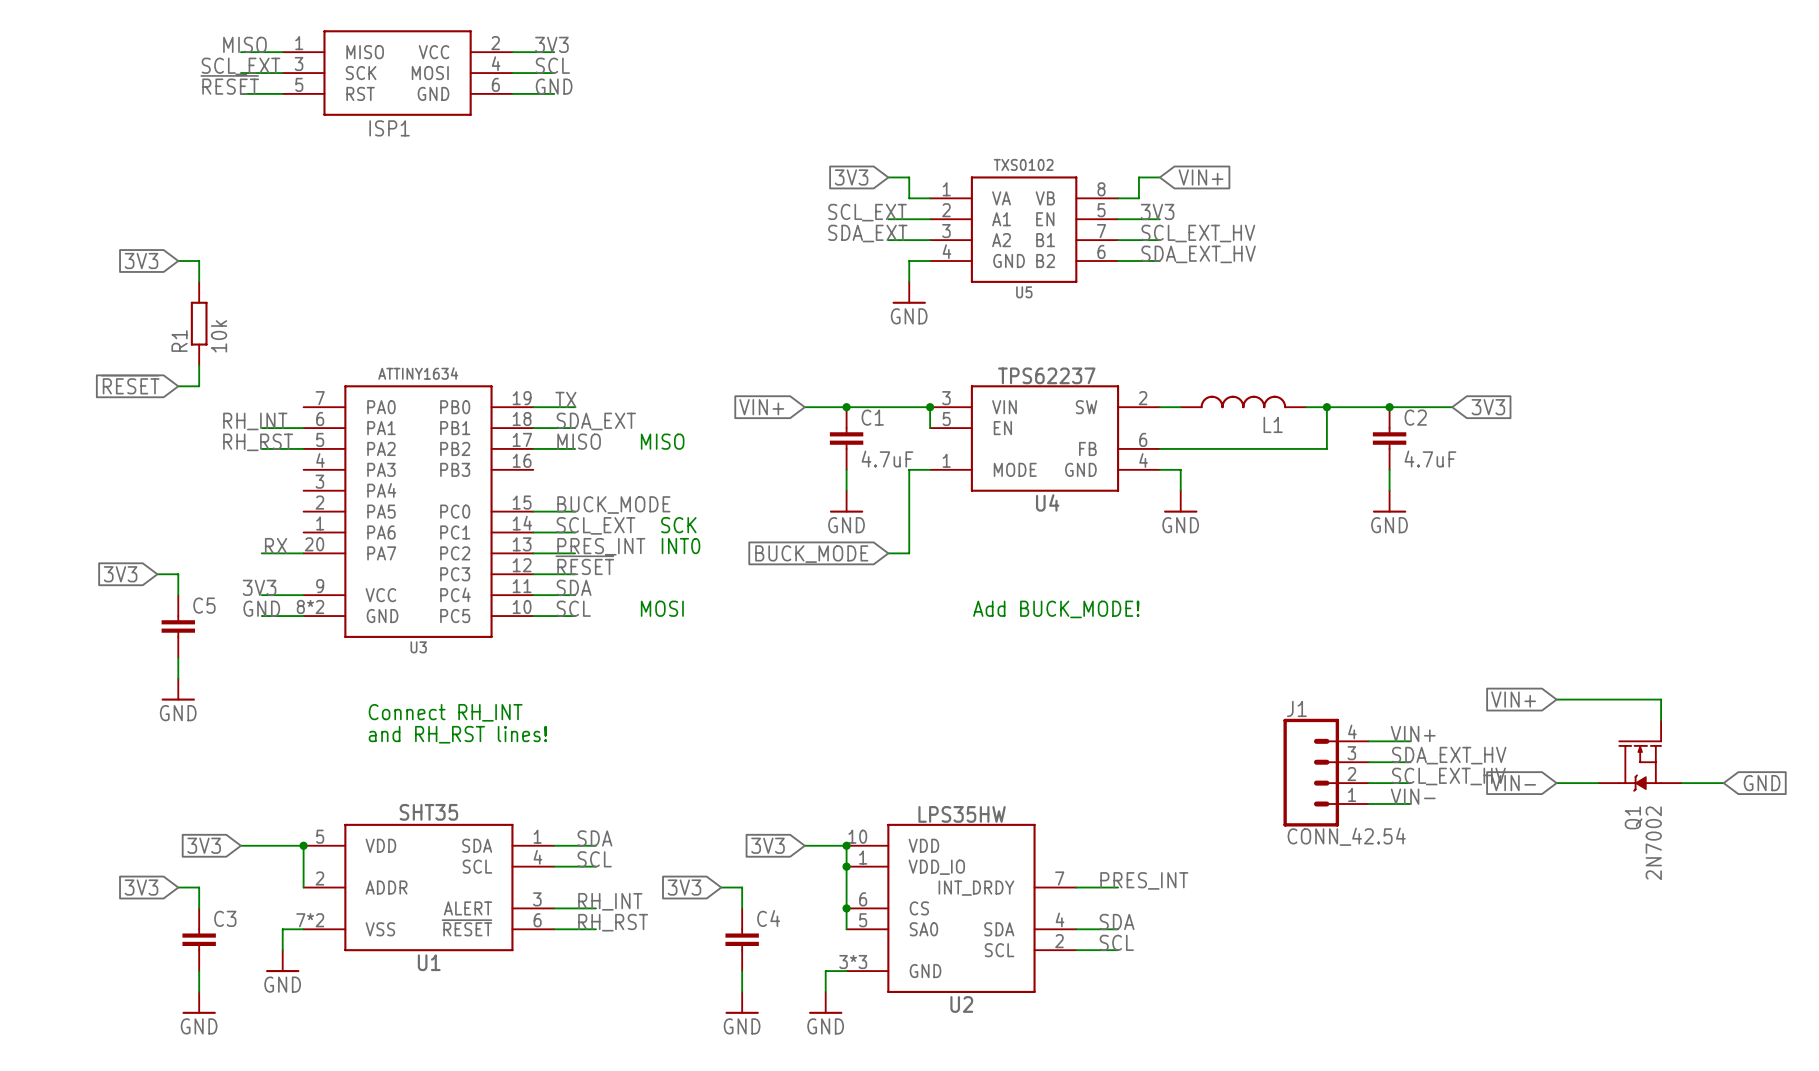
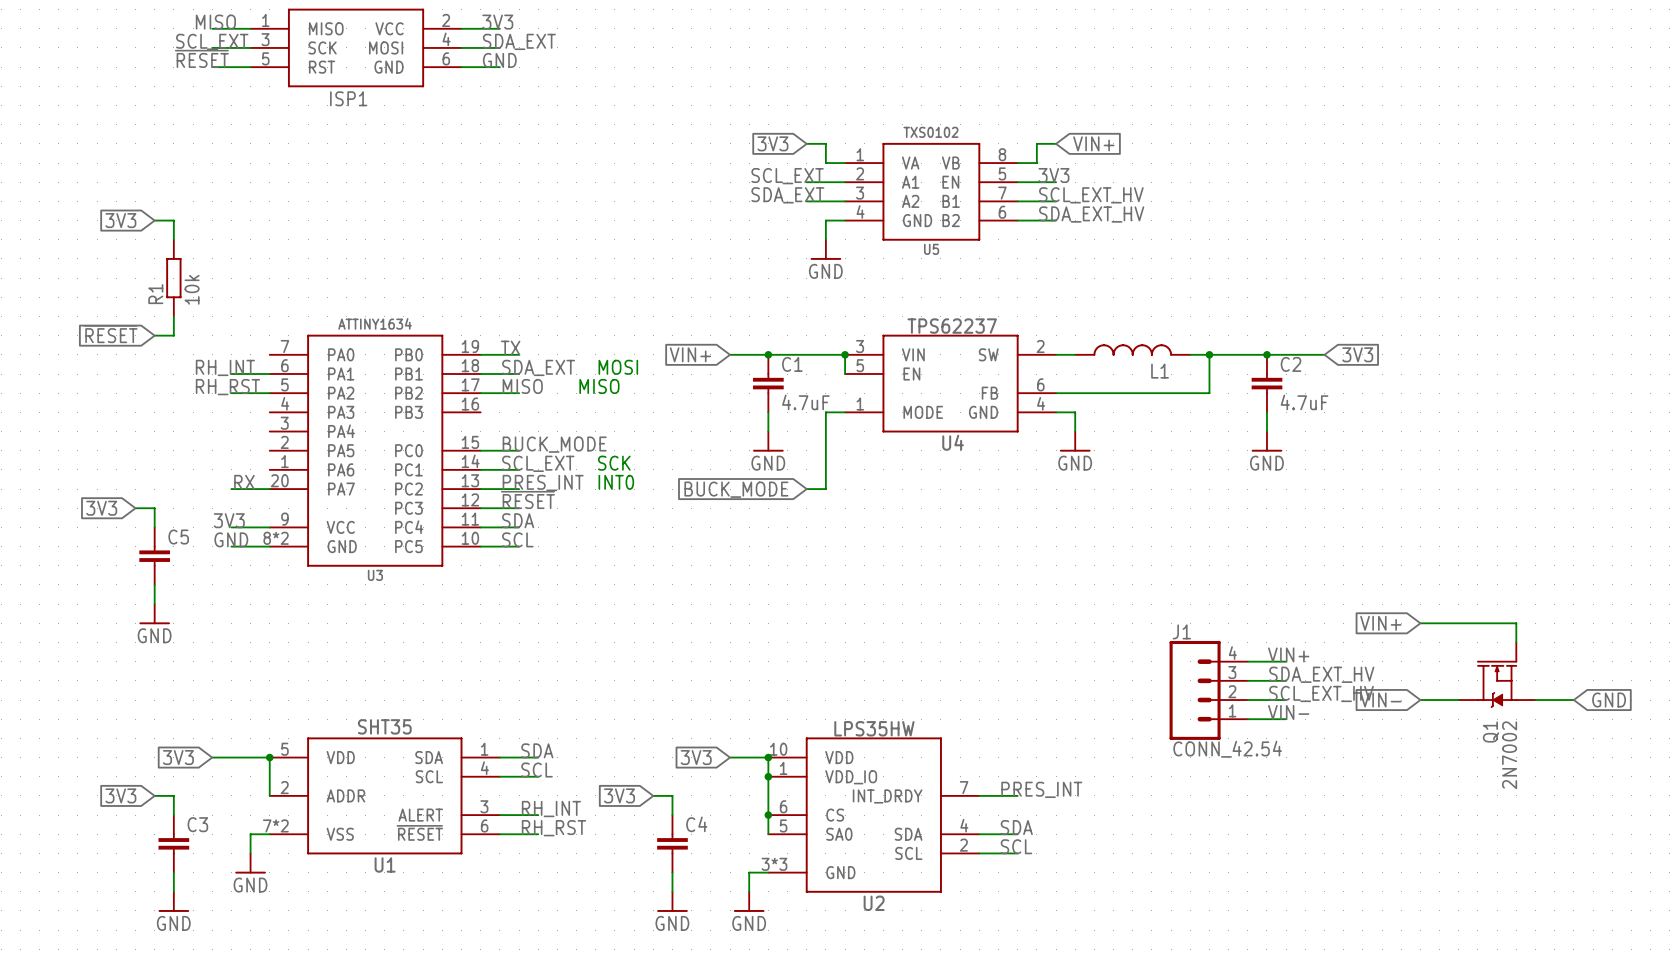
label: SCL (552, 65) -> SDA_EXT (519, 41)
text position: MOSI (662, 608) -> MOSI (618, 367)
text: Add BUCK_MODE! (1056, 609) -> none
text: Connect RH_INT (445, 712) -> none
text: and RH_RST lines! (457, 734) -> none

